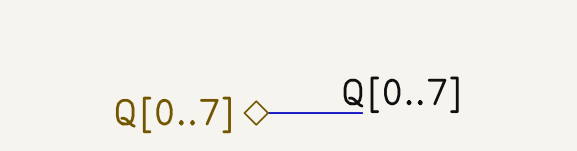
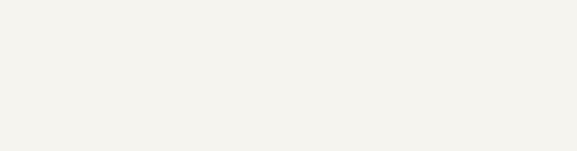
label: Q[0..7] (401, 94) -> none
bus: (268, 113) (362, 113) -> none
hierarchical label: Q[0..7] (173, 114) -> none

